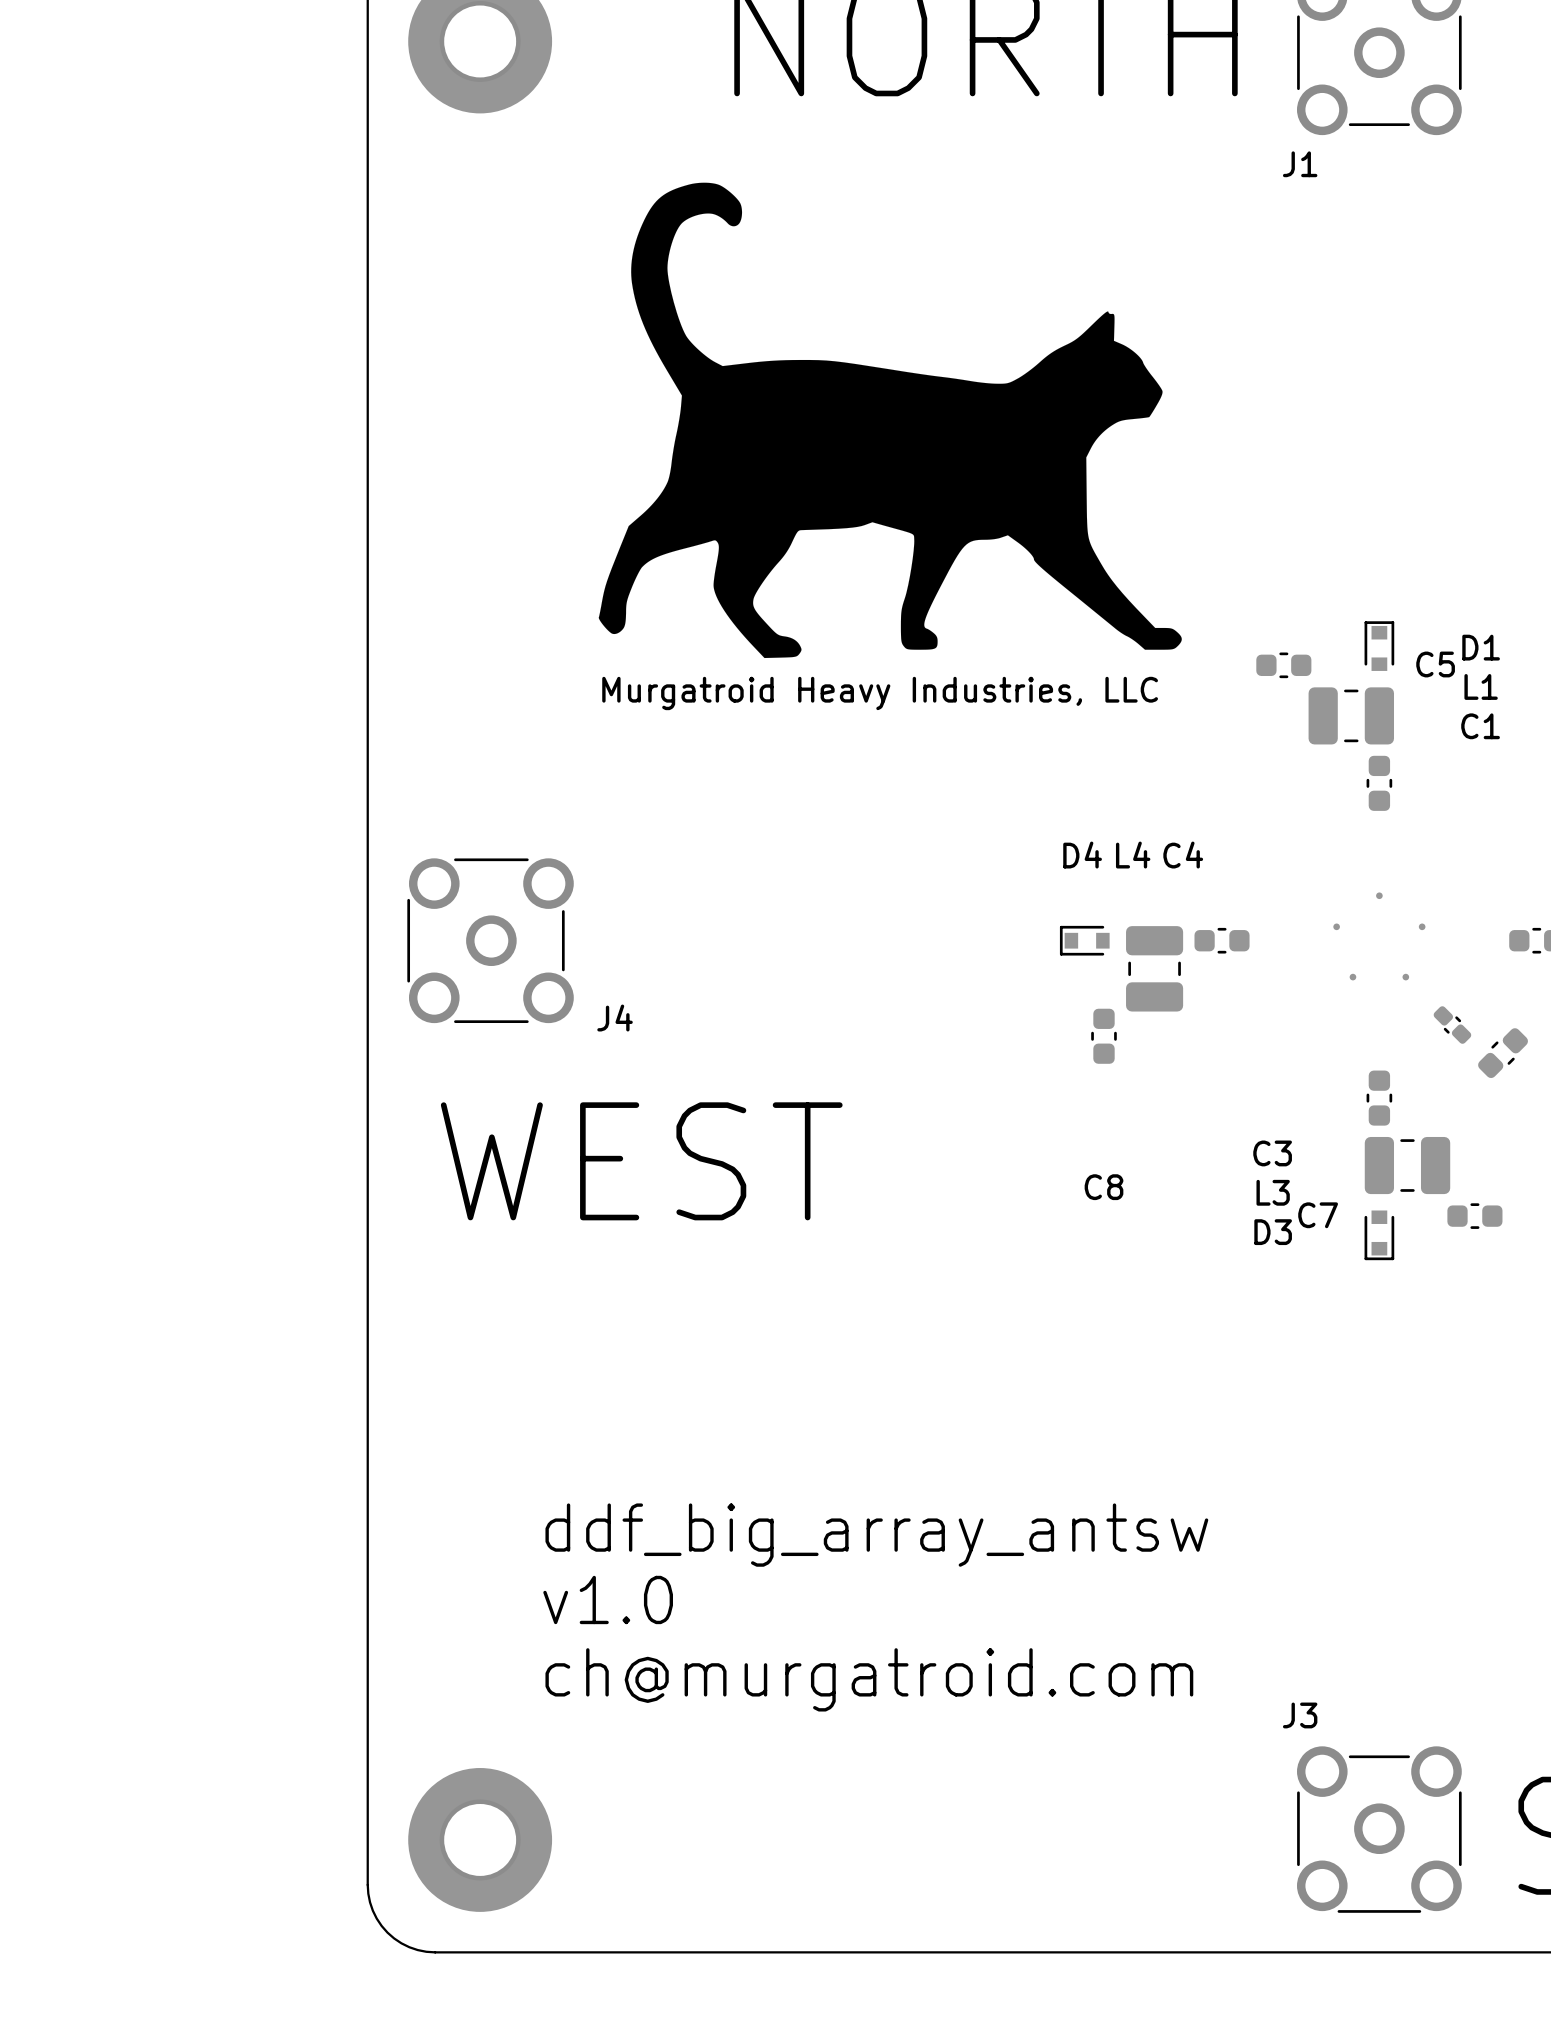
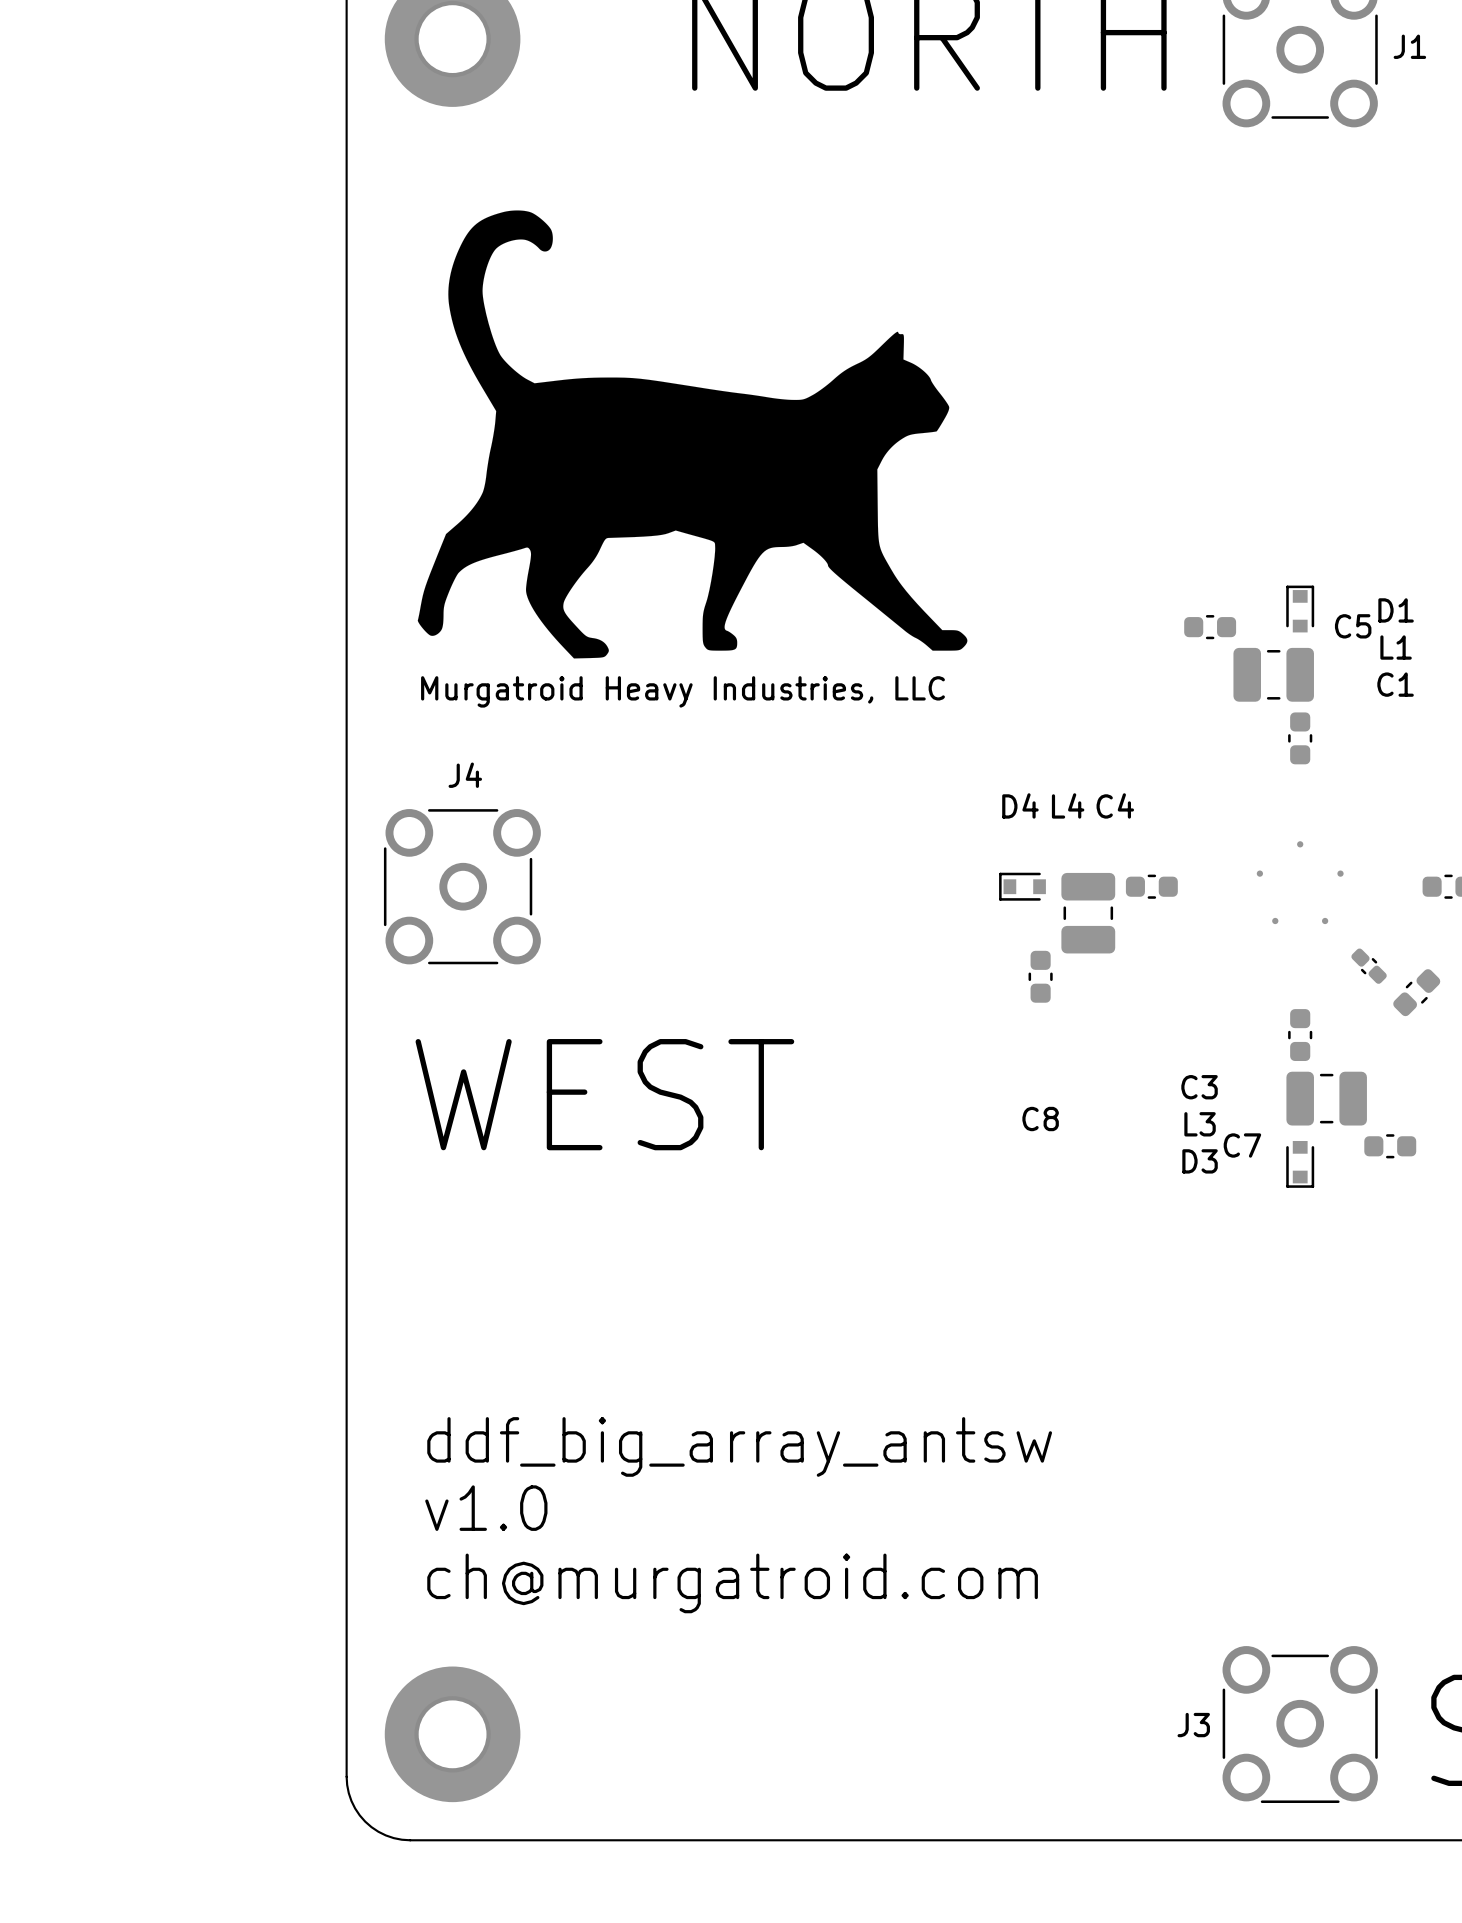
J1 name position: J1 (1300, 164) -> J1 (1409, 46)
drawing position: (890, 420) -> (692, 434)
text position: Murgatroid Heavy Industries, LLC (880, 693) -> Murgatroid Heavy Industries, LLC (682, 691)
J4 name position: J4 (615, 1018) -> J4 (465, 775)
text position: ddf_big_array_antsw (876, 1535) -> ddf_big_array_antsw (739, 1446)
text position: v1.0 (608, 1599) -> v1.0 (486, 1508)
text position: ch@murgatroid.com (869, 1679) -> ch@murgatroid.com (732, 1583)
J3 name position: J3 (1300, 1715) -> J3 (1193, 1725)

